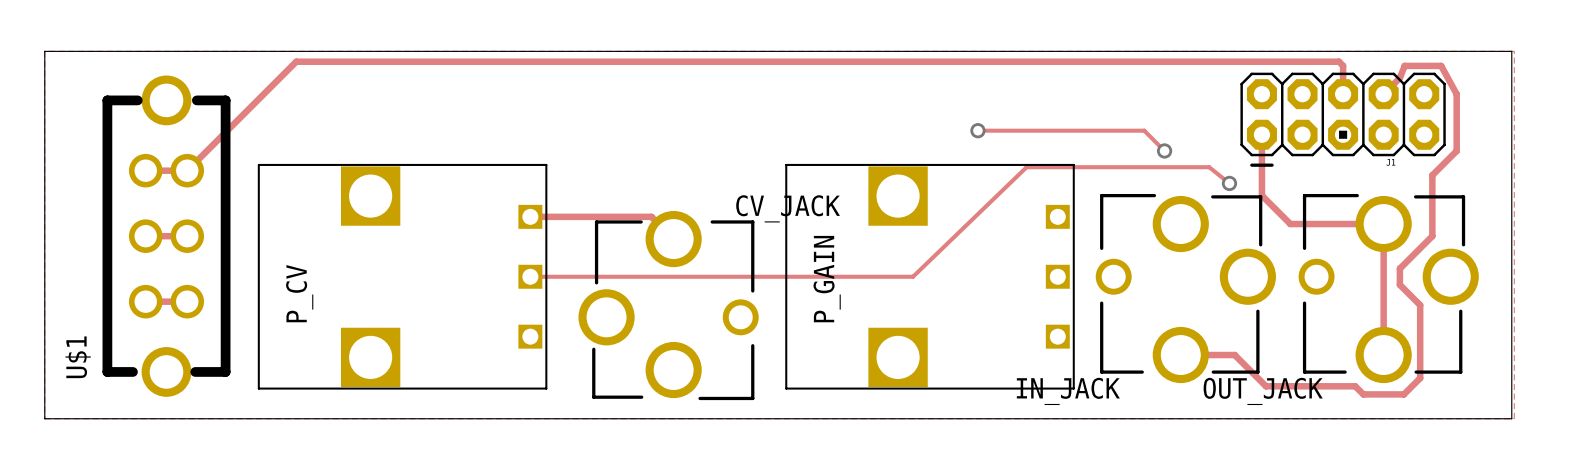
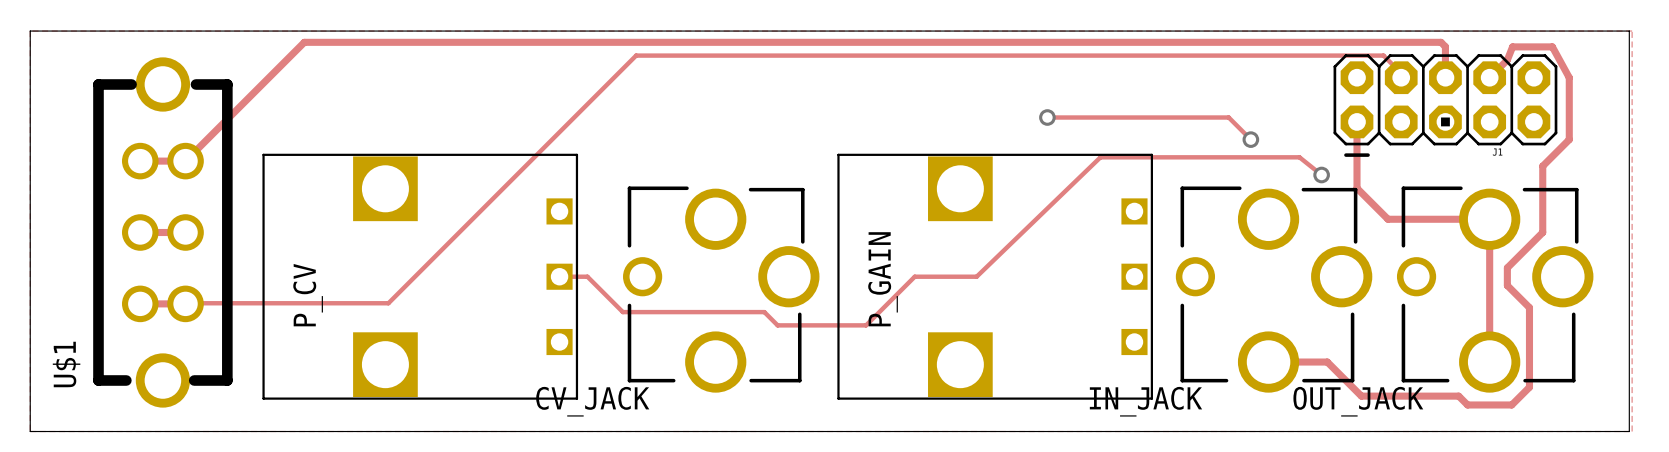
track: none -> (1401, 77) (1401, 73) (1383, 55) (636, 55) (388, 303) (176, 303)
track: (530, 216) (651, 216) (673, 239) -> none
track: (555, 276) (856, 276) -> (587, 276) (622, 312) (764, 312) (777, 325) (866, 325) (914, 276)
CV_JACK rotation: 0° (668, 305) -> 180° (721, 289)

